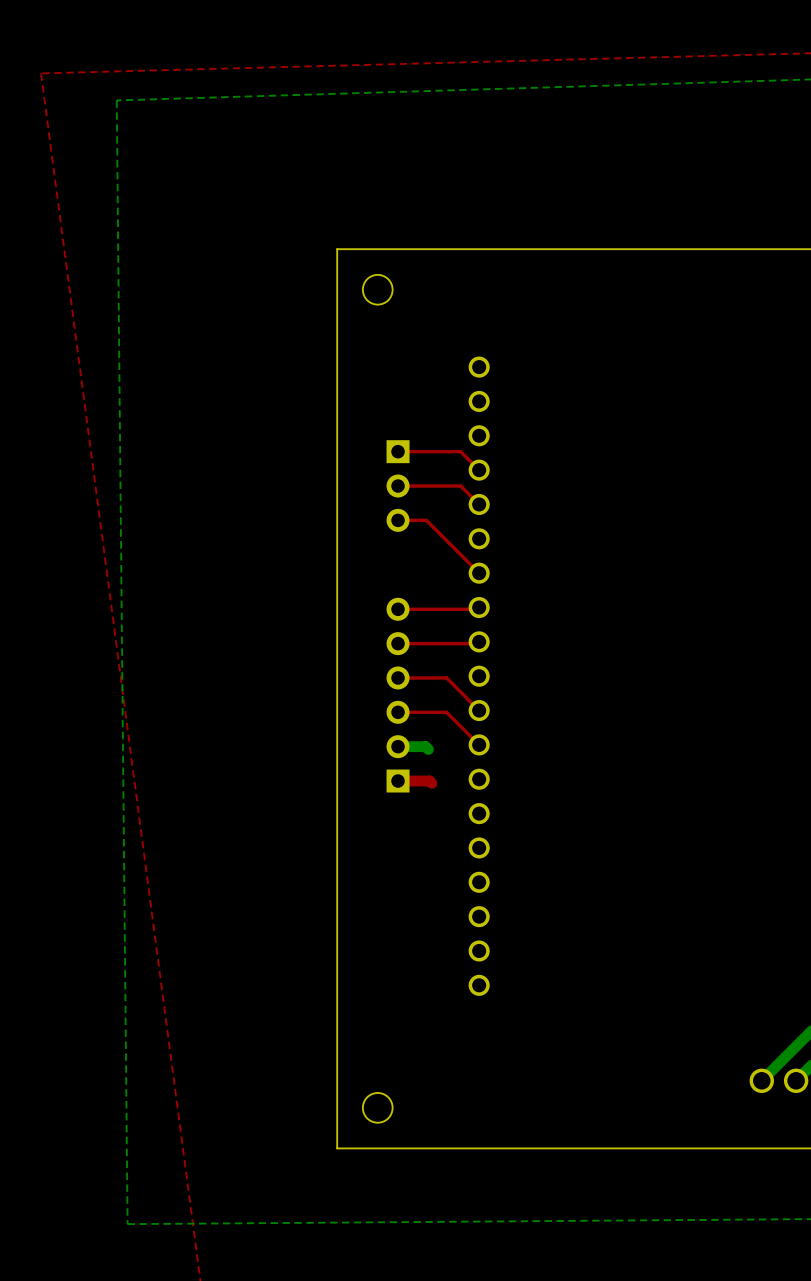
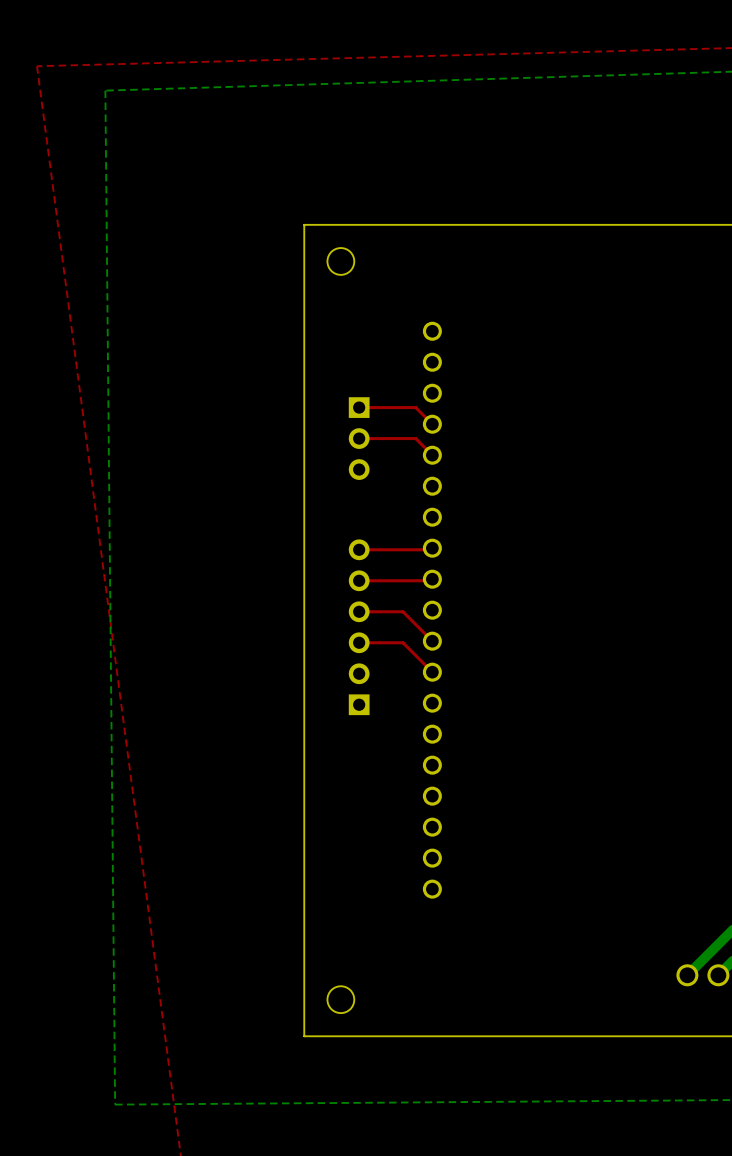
top track: (398, 520) (426, 520) (479, 573) -> none
bottom track: (398, 746) (425, 746) (428, 749) -> none
top track: (398, 781) (429, 781) (431, 783) -> none

